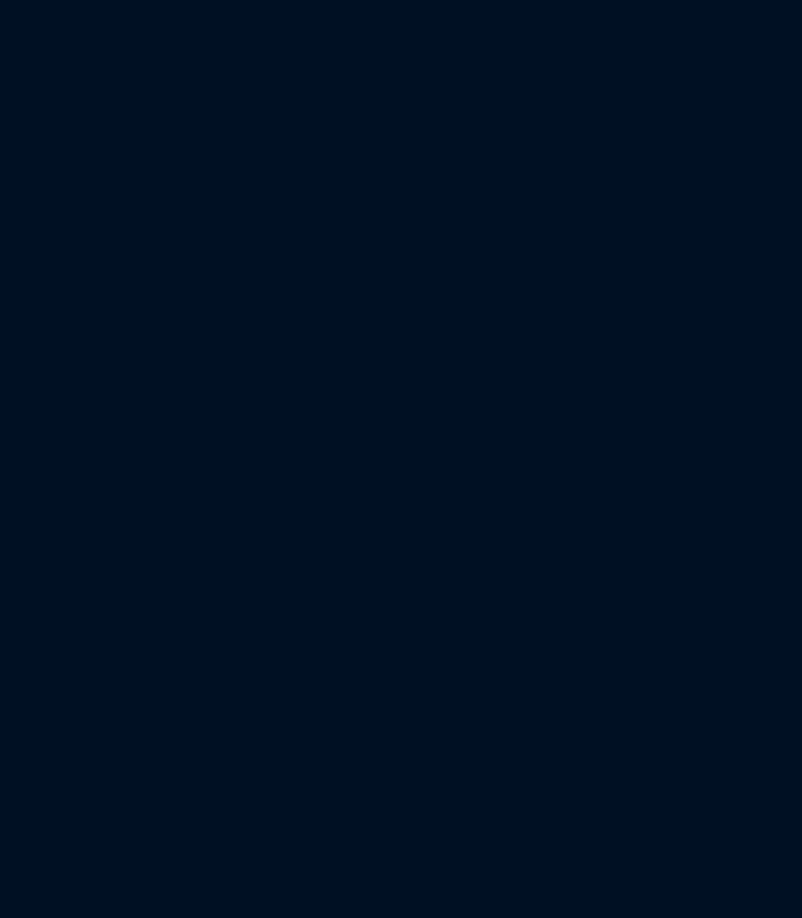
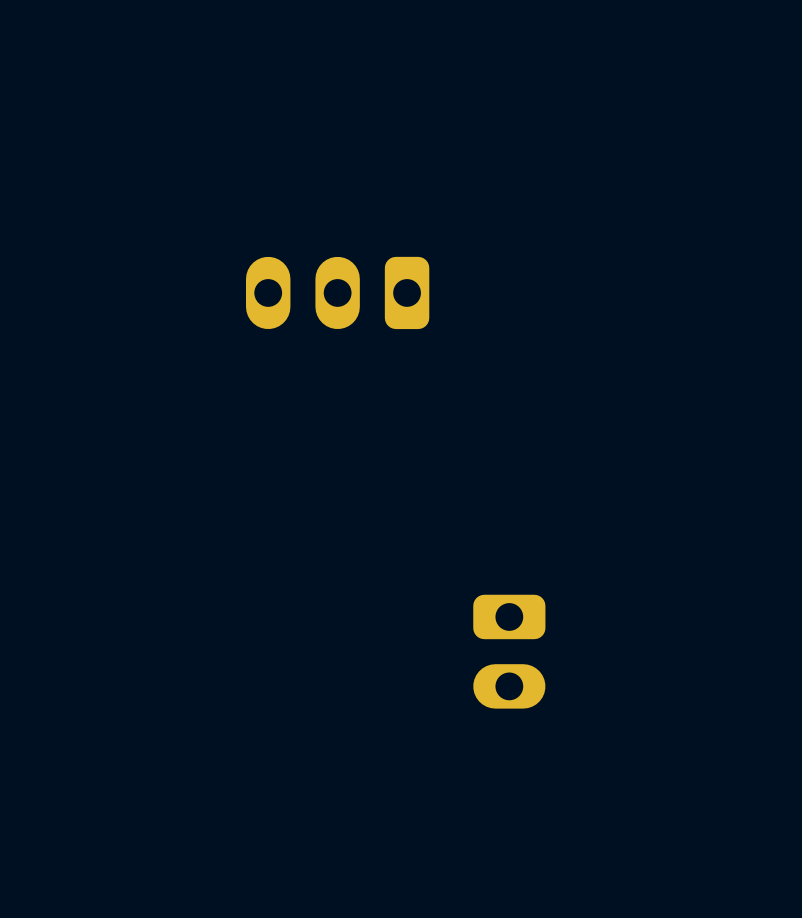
part: none -> (337, 292)
part: none -> (509, 651)

